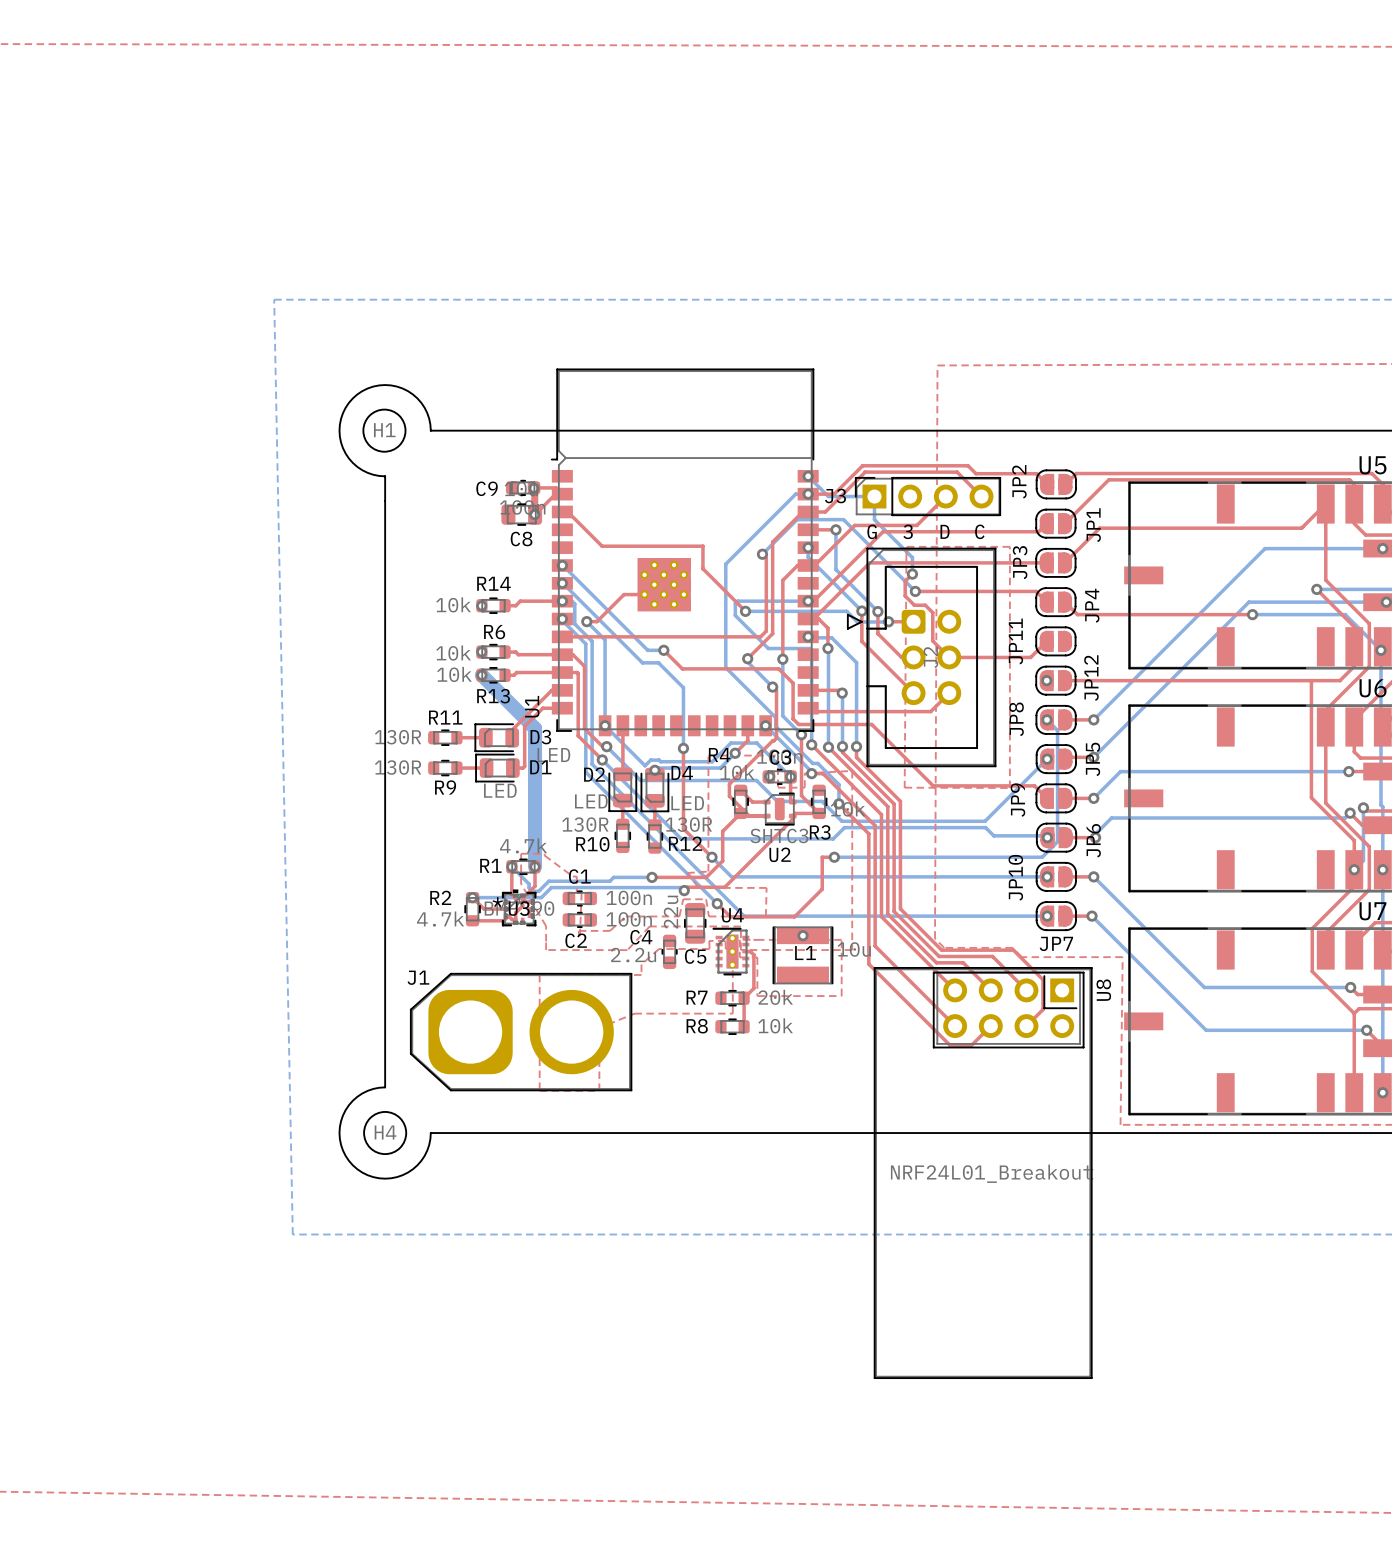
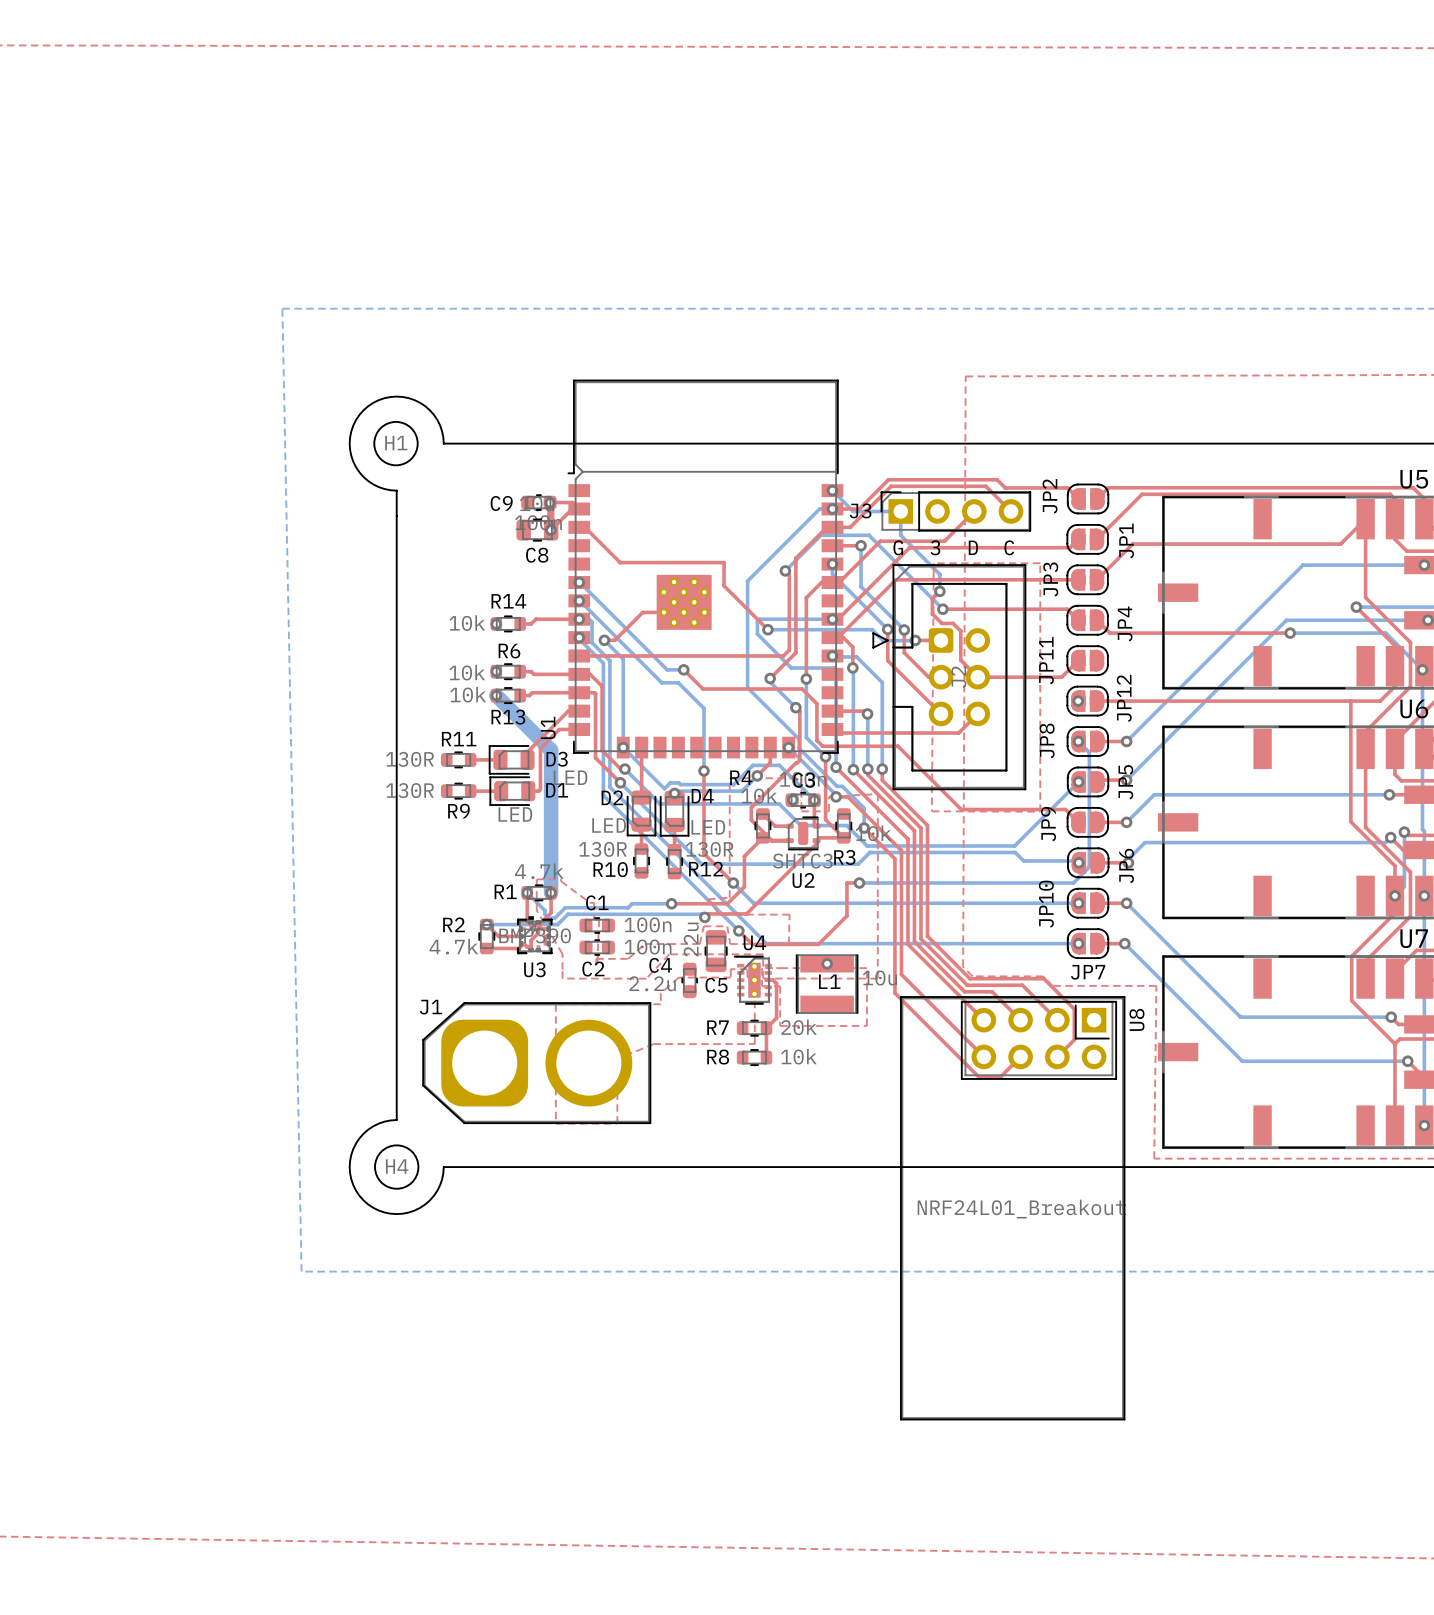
U3 text: * (497, 902) -> none
U3 name position: U3 (519, 908) -> U3 (534, 969)

